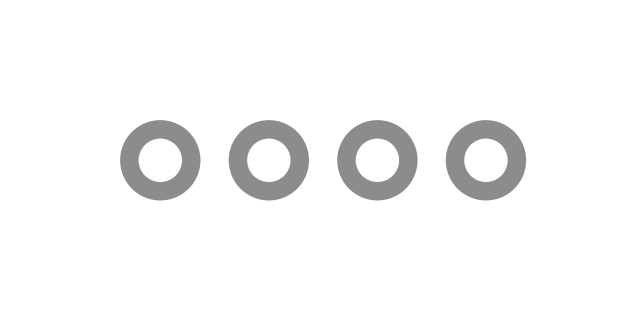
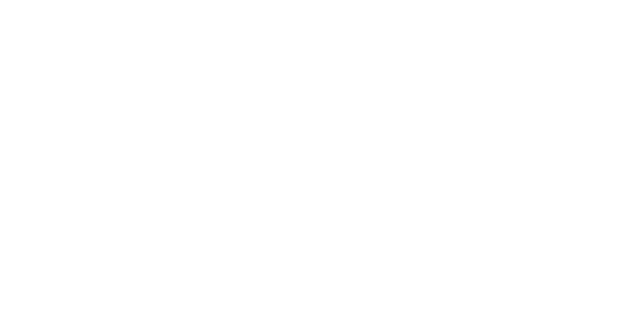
part: (323, 160) -> none

